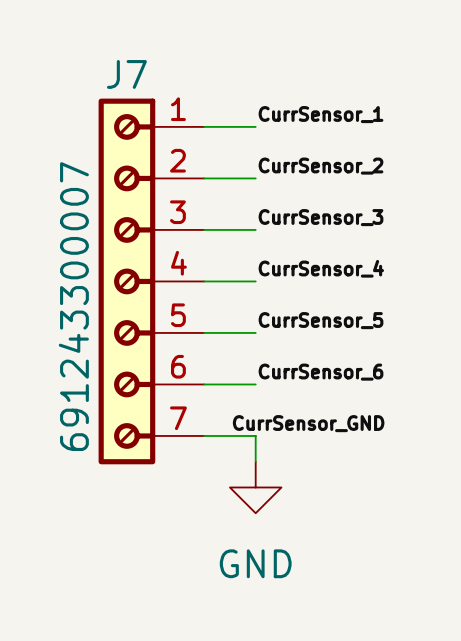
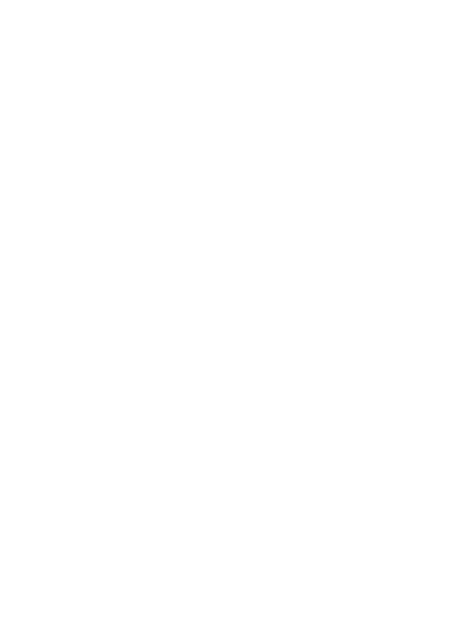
label: CurrSensor_1 (321, 114) -> none
wire: (204, 126) (255, 126) -> none
label: CurrSensor_2 (321, 166) -> none
wire: (204, 178) (255, 178) -> none
label: CurrSensor_3 (321, 217) -> none
wire: (204, 229) (255, 229) -> none
label: CurrSensor_4 (321, 268) -> none
J7: 691243300007 (151, 281) -> none
wire: (204, 281) (255, 281) -> none
label: CurrSensor_5 (321, 320) -> none
wire: (204, 332) (255, 332) -> none
label: CurrSensor_6 (321, 372) -> none
wire: (204, 384) (255, 384) -> none
label: CurrSensor_GND (308, 423) -> none
wire: (204, 435) (255, 435) (255, 461) -> none
power symbol: GND (255, 487) -> none

